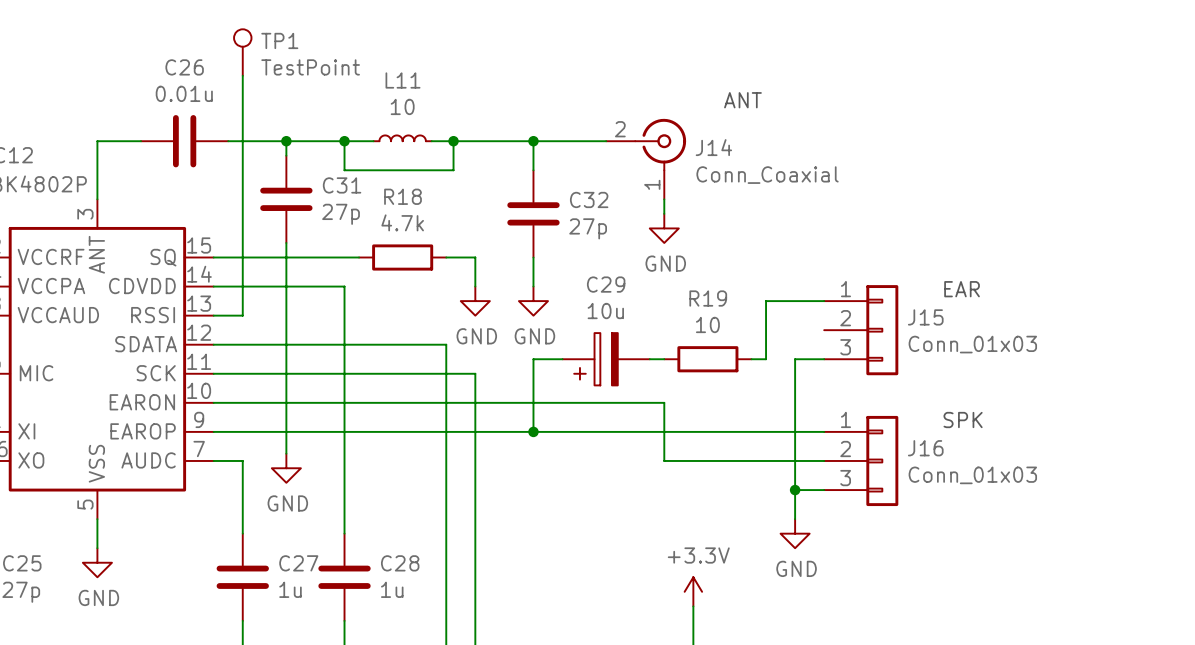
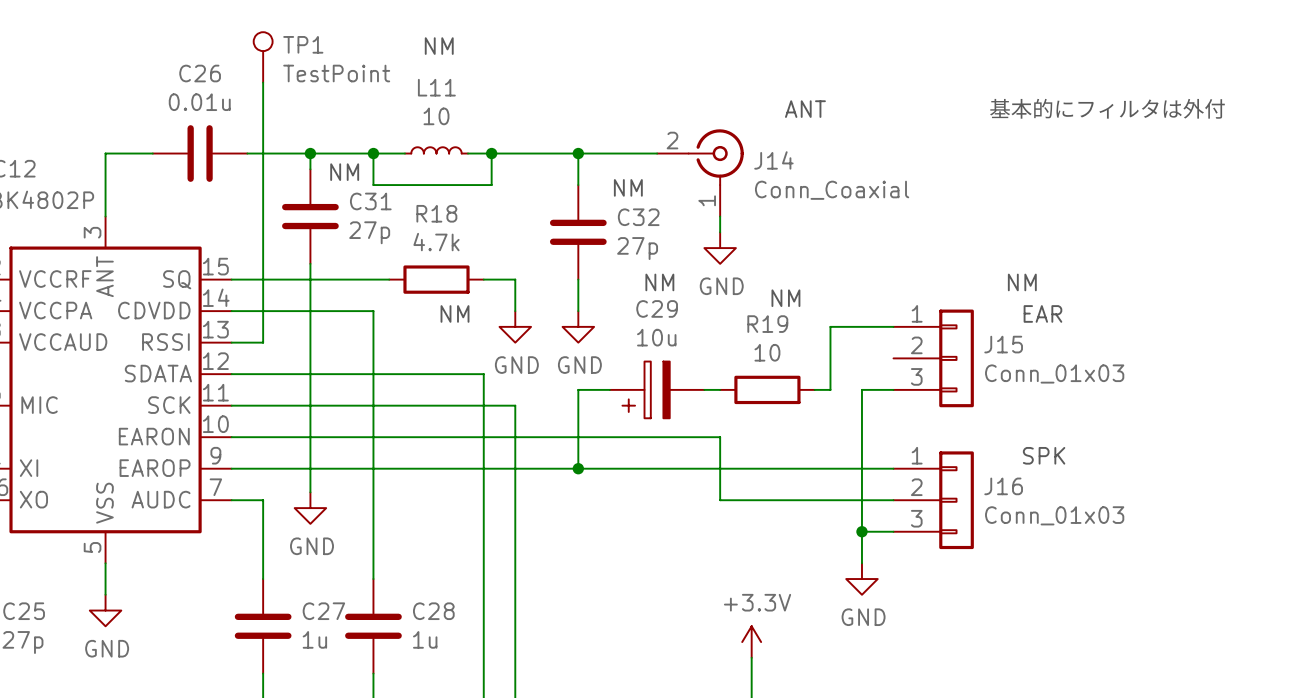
text: none -> NM (439, 46)
text: none -> 基本的にフィルタは外付 (1107, 108)
text: none -> NM (344, 172)
text: none -> NM (628, 187)
text: none -> NM (659, 282)
text: none -> NM (1022, 282)
text: none -> NM (785, 298)
text: none -> NM (454, 313)

